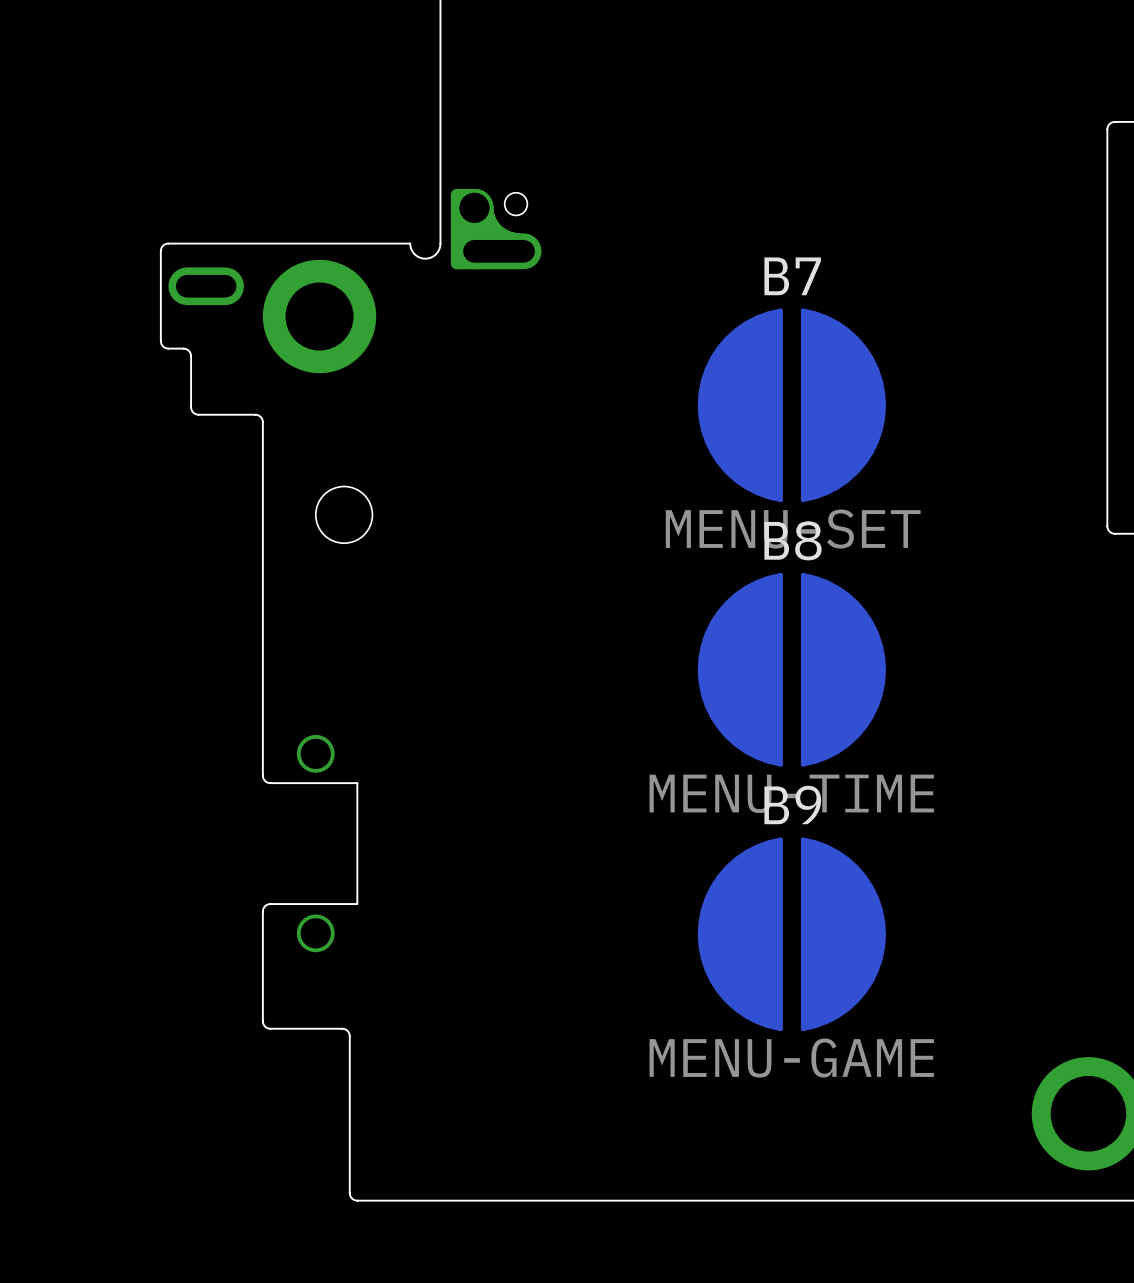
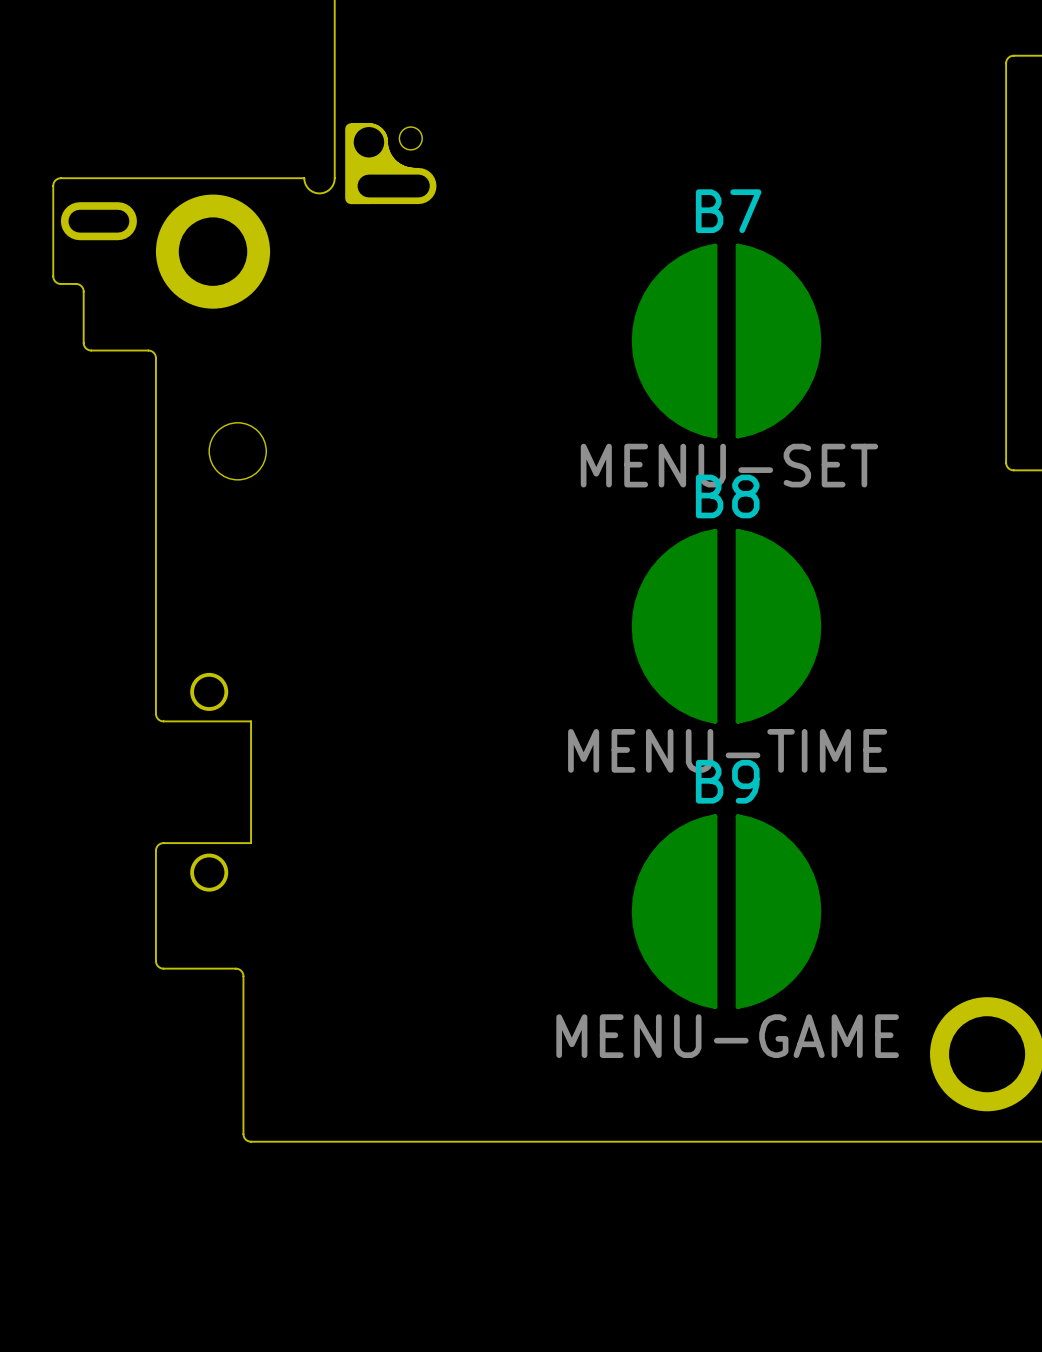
B7 position: (791, 405) -> (726, 341)
B8 position: (791, 669) -> (726, 626)
B9 position: (791, 934) -> (726, 911)

